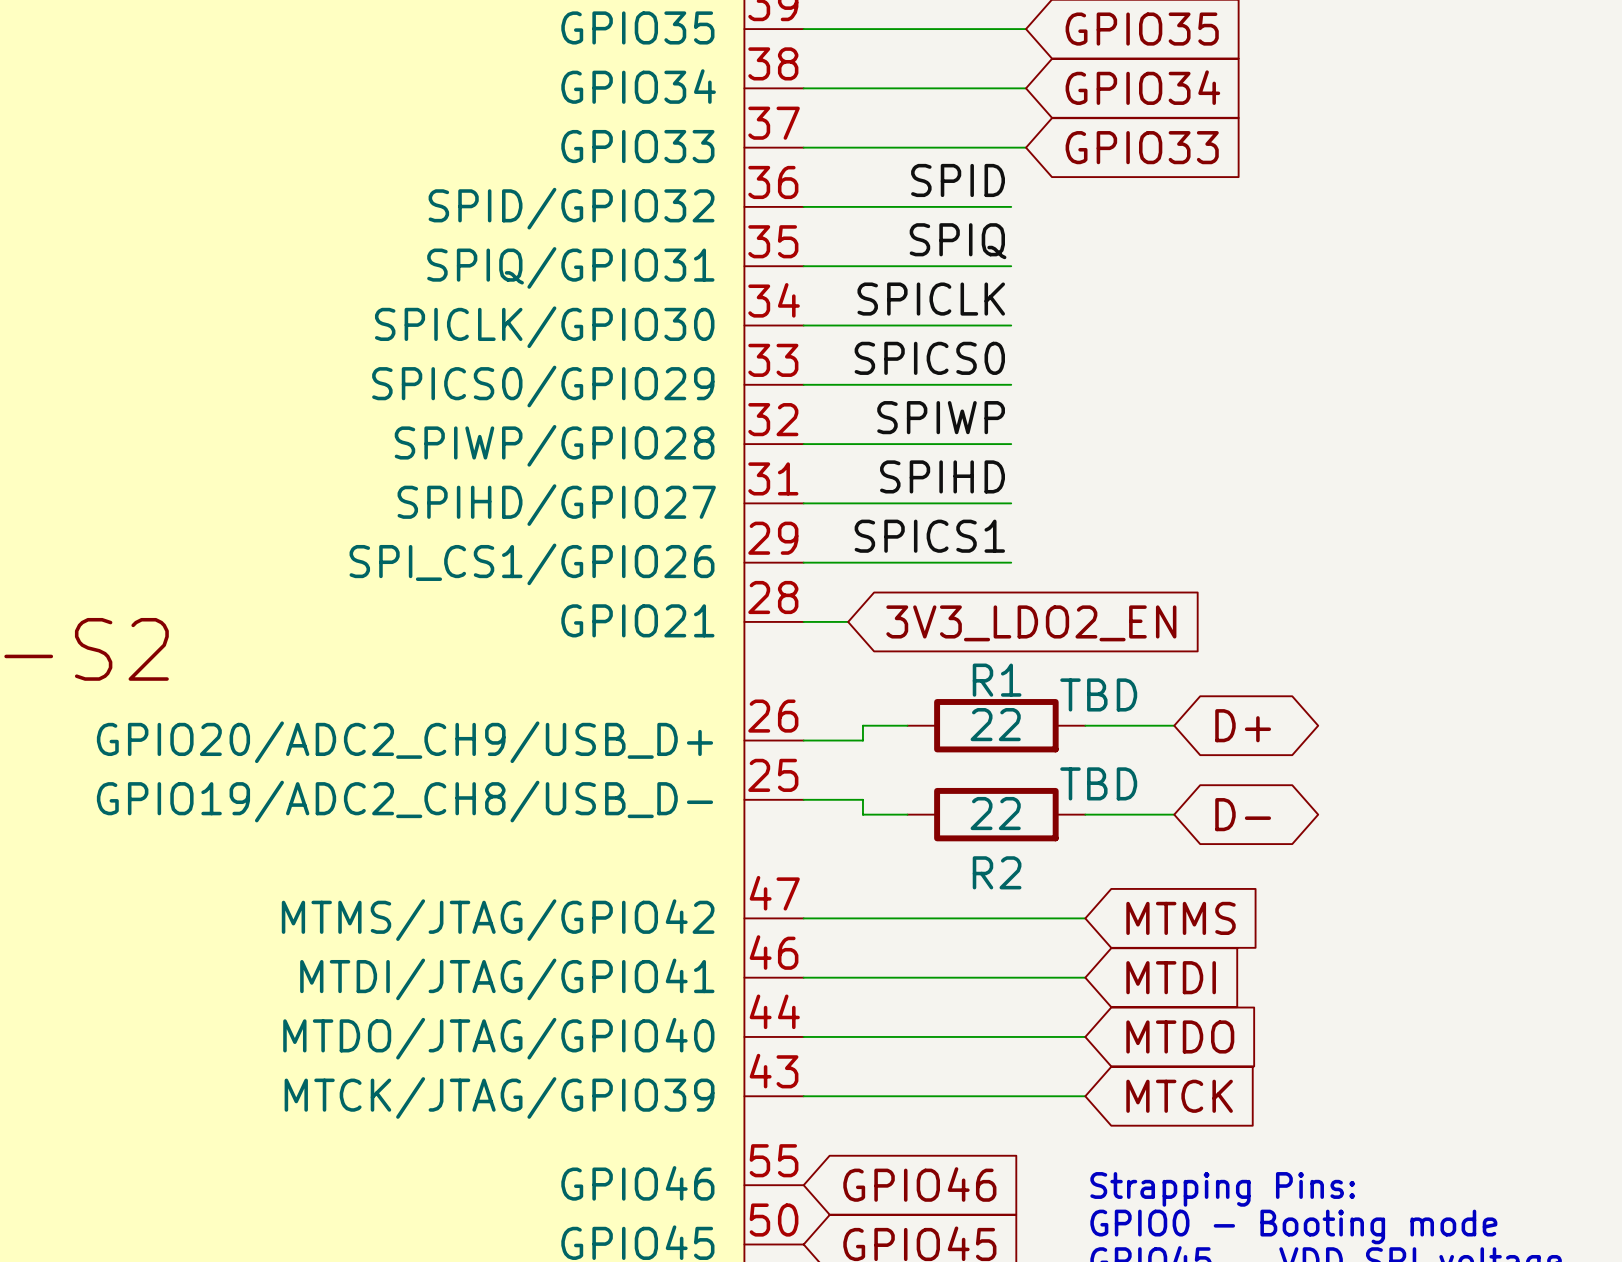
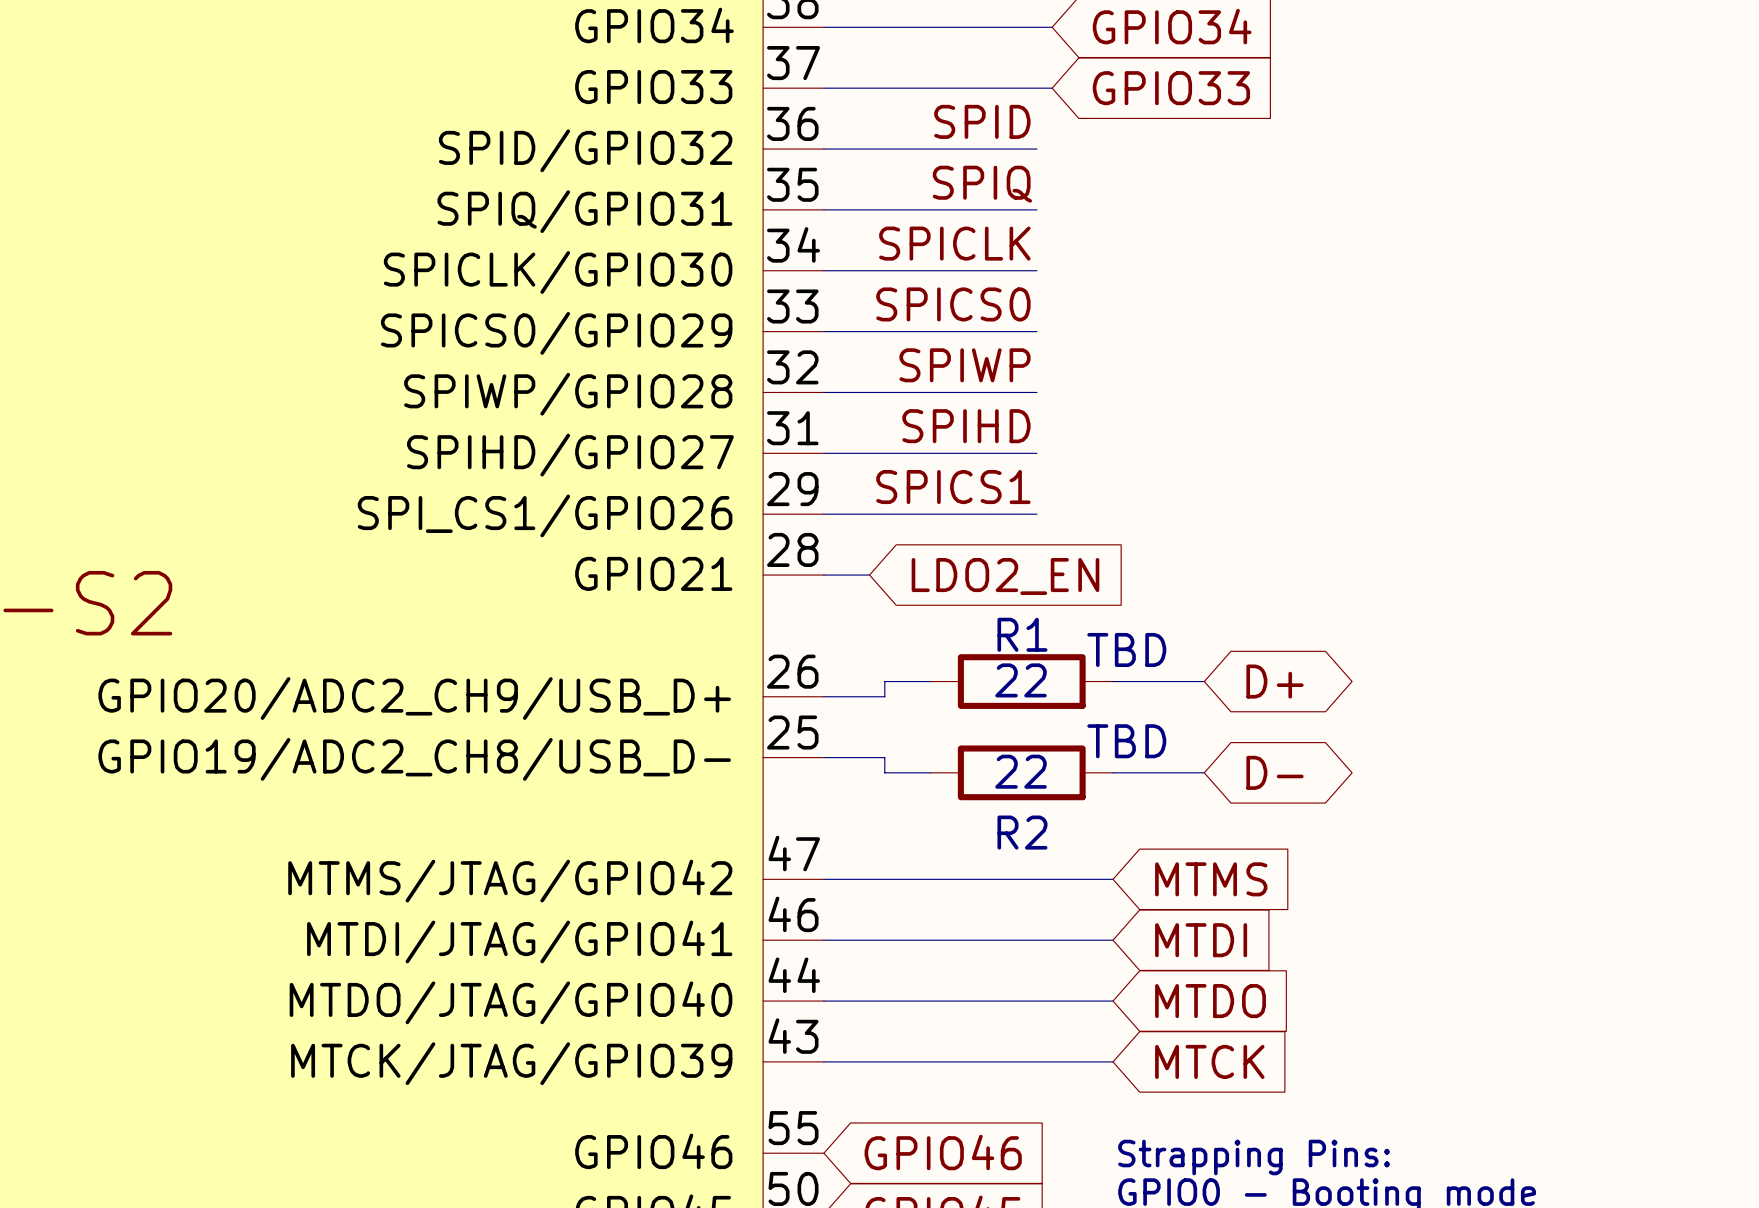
global label: 3V3_LDO2_EN (1031, 623) -> LDO2_EN (1005, 576)

